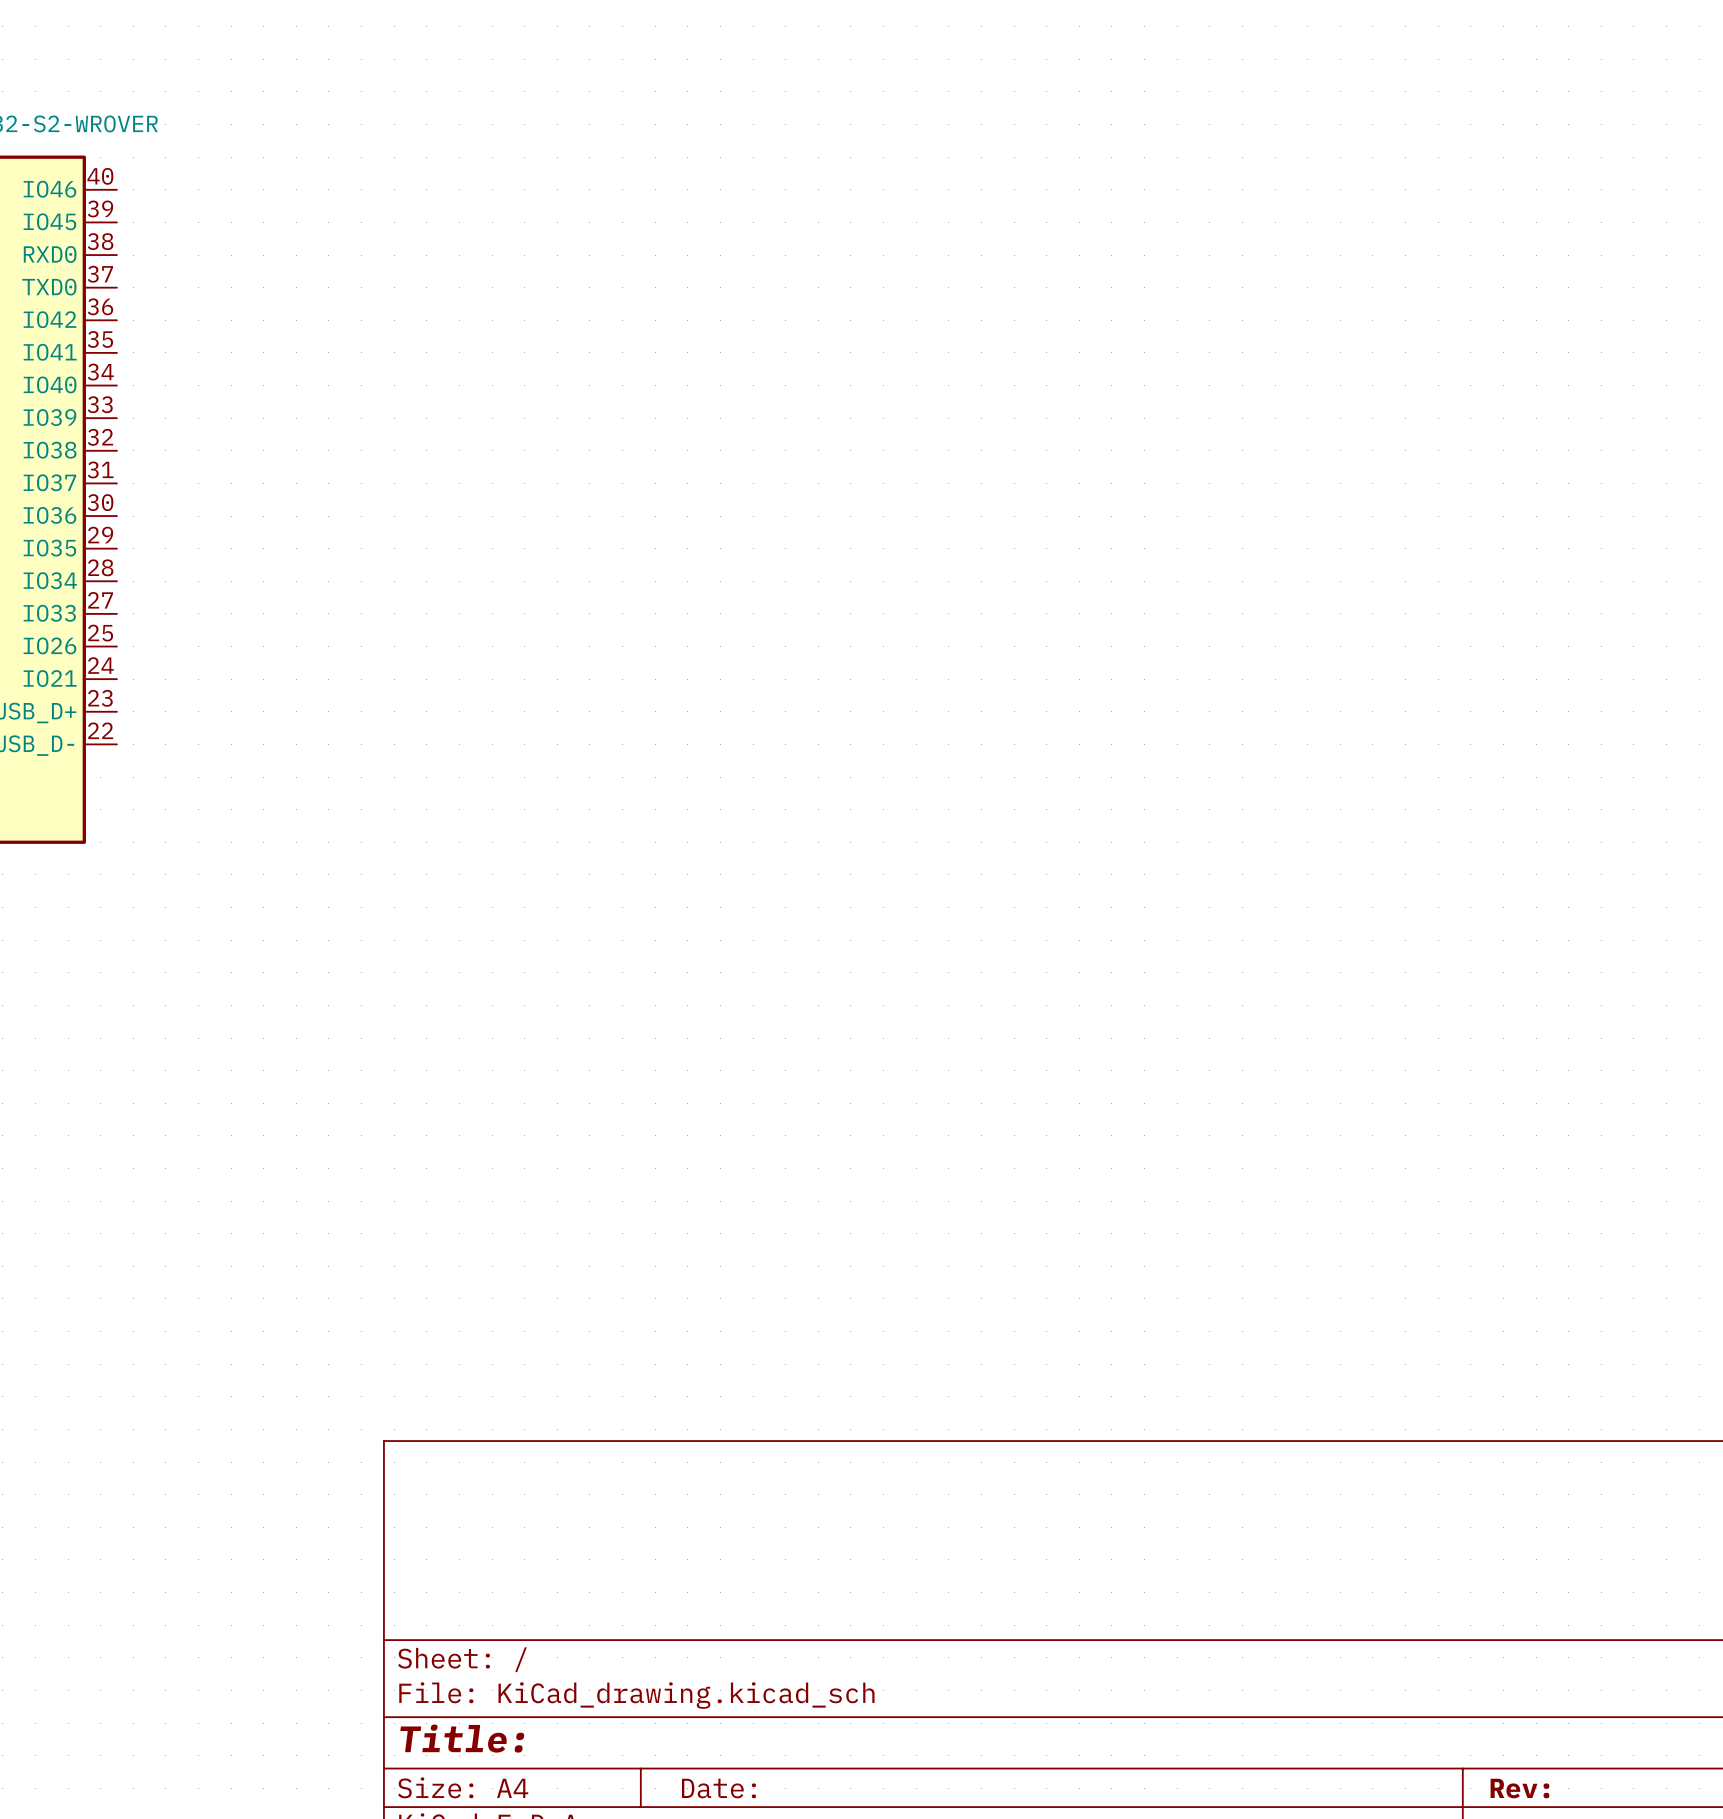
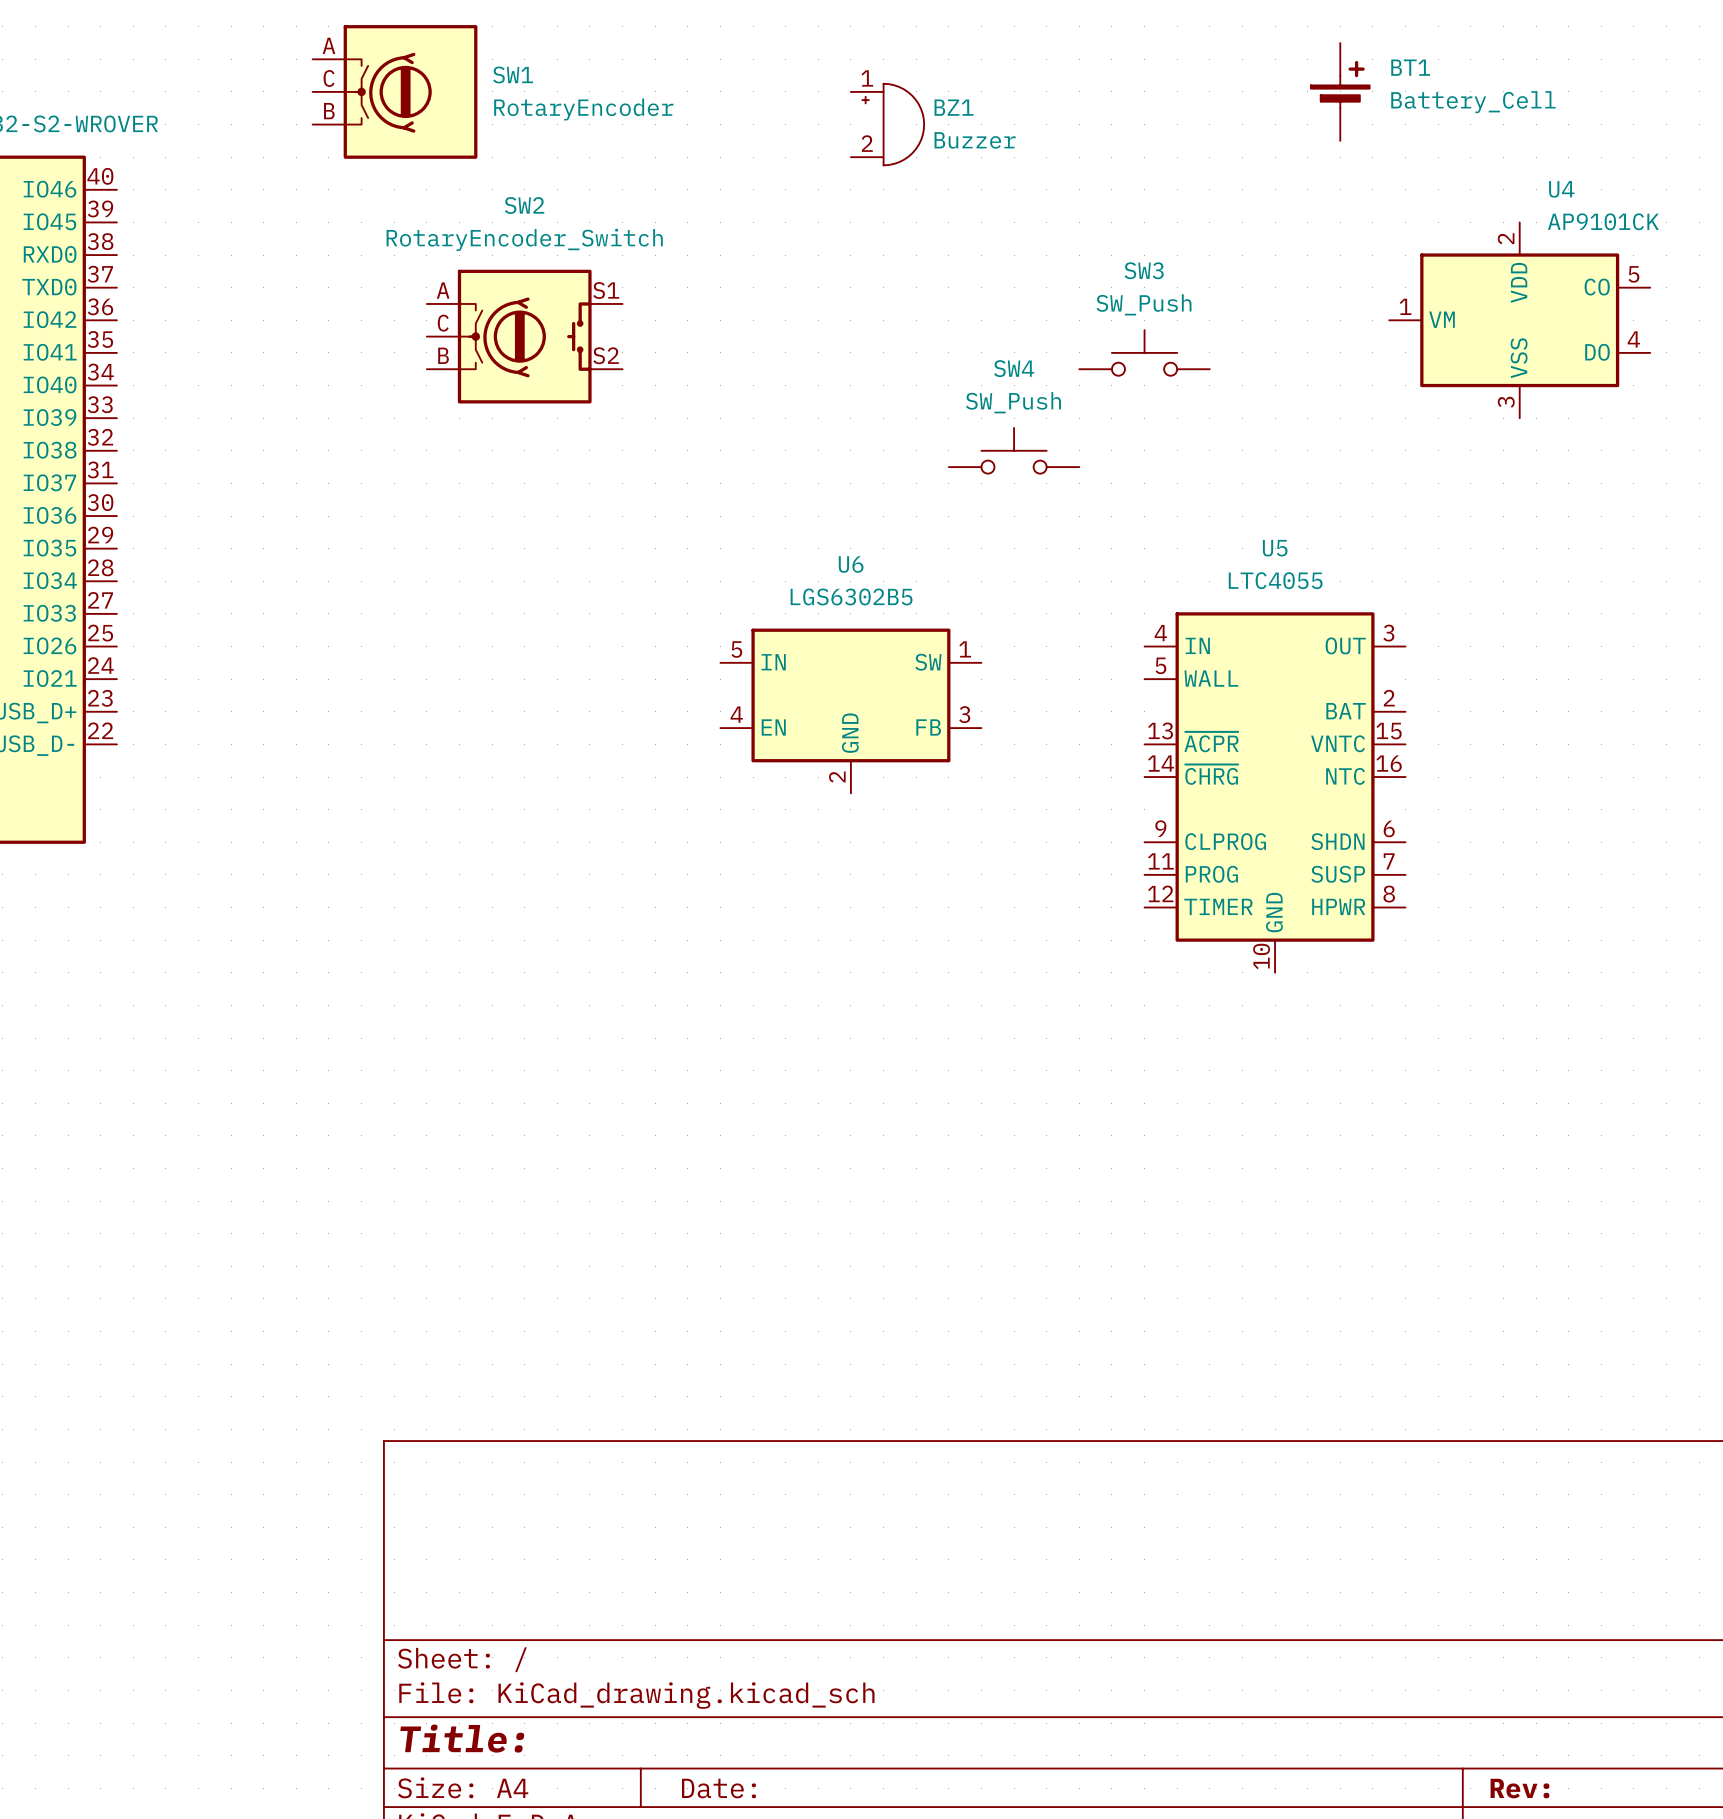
SW1: none -> RotaryEncoder (395, 91)
BT1: none -> Battery_Cell (1340, 91)
BZ1: none -> Buzzer (887, 124)
U4: none -> AP9101CK (1519, 320)
SW2: none -> RotaryEncoder_Switch (524, 336)
SW3: none -> SW_Push (1144, 352)
SW4: none -> SW_Push (1014, 450)
U6: none -> LGS6302B5 (850, 710)
U5: none -> LTC4055 (1275, 792)

